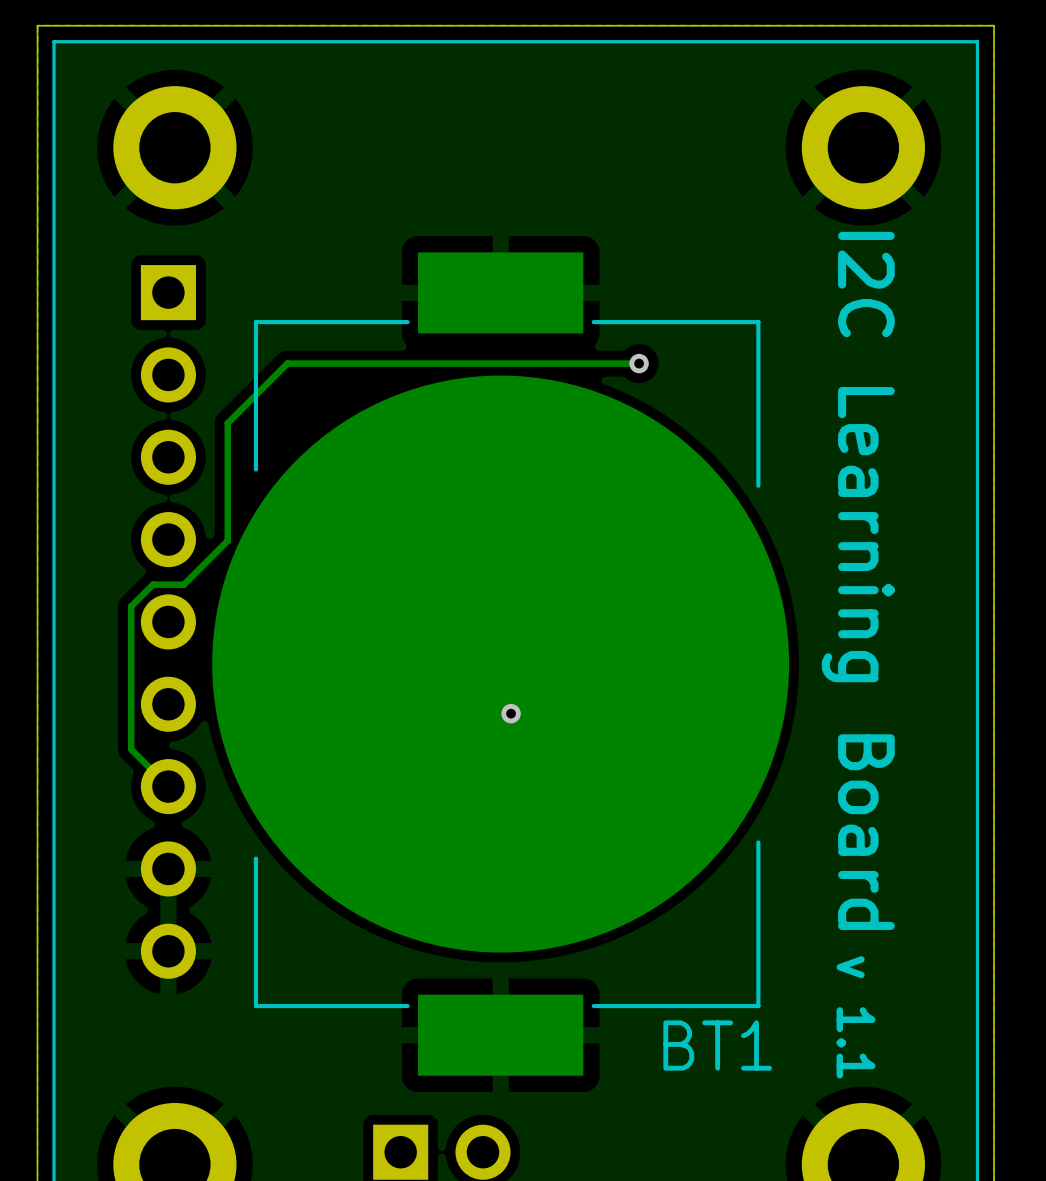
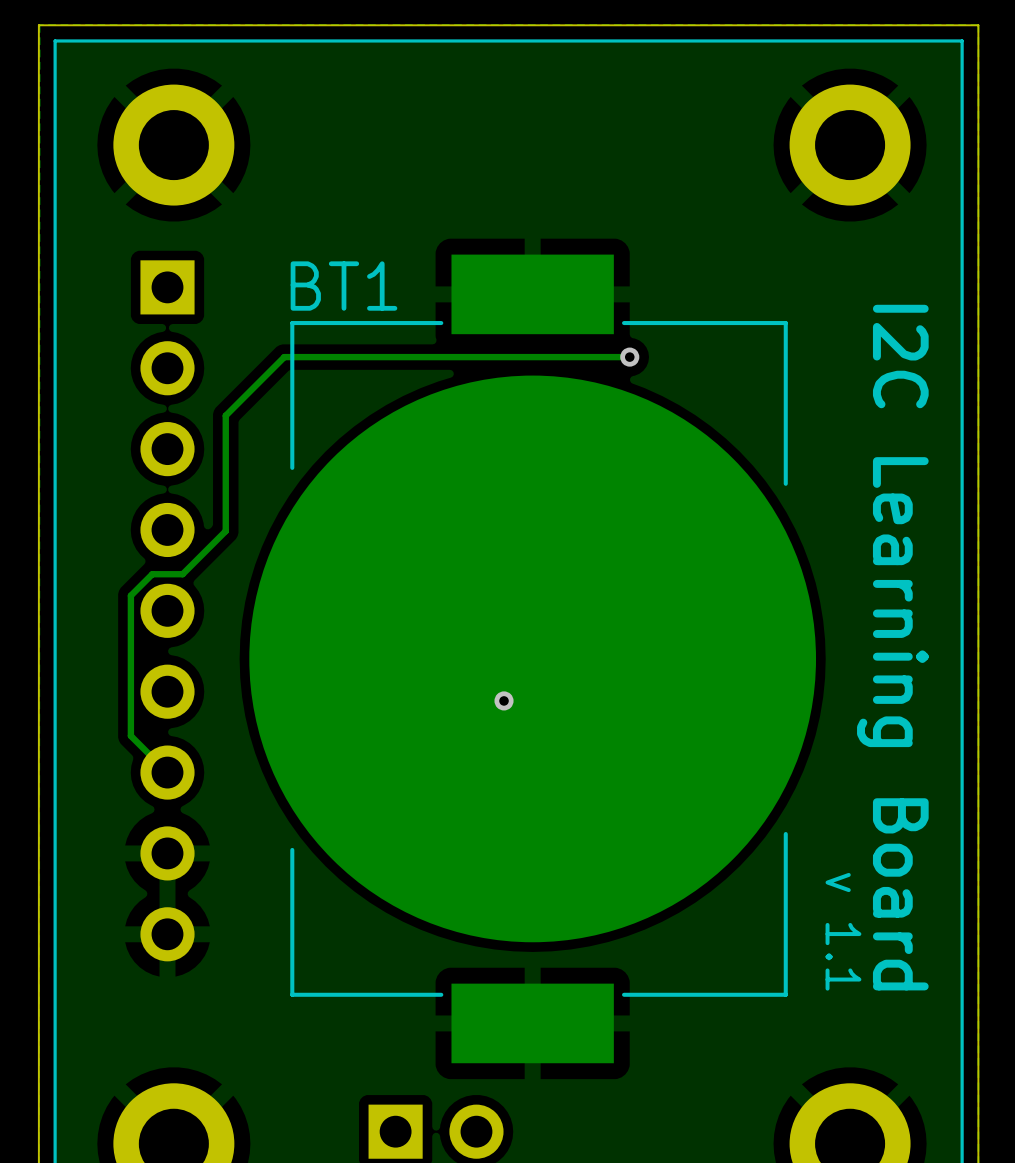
text position: I2C Learning Board (858, 580) -> I2C Learning Board (892, 647)
BT1 position: (500, 664) -> (532, 658)
text position: v 1.1 (856, 1017) -> v 1.1 (843, 931)
BT1 name position: BT1 (717, 1045) -> BT1 (343, 286)

